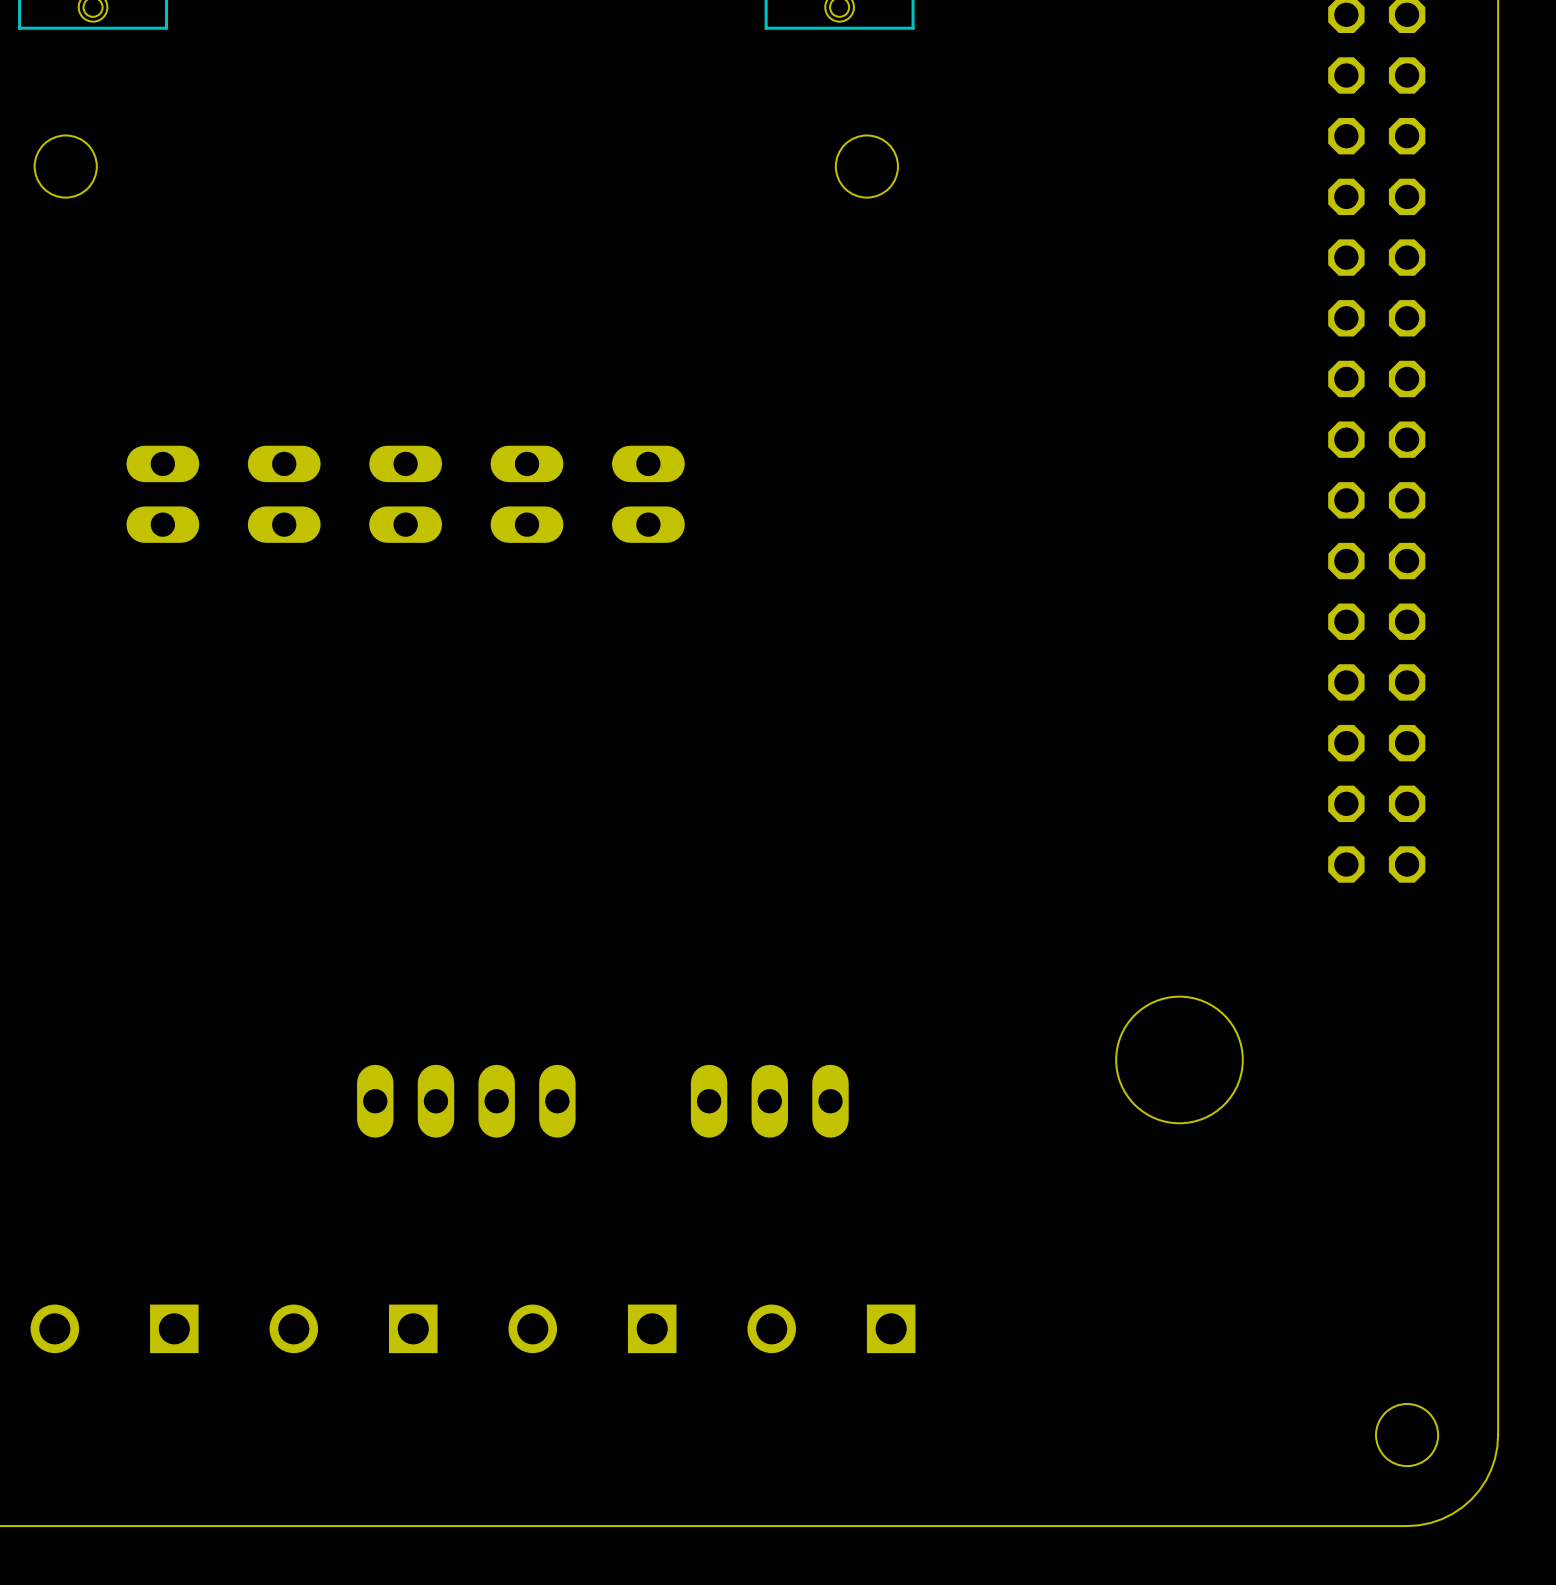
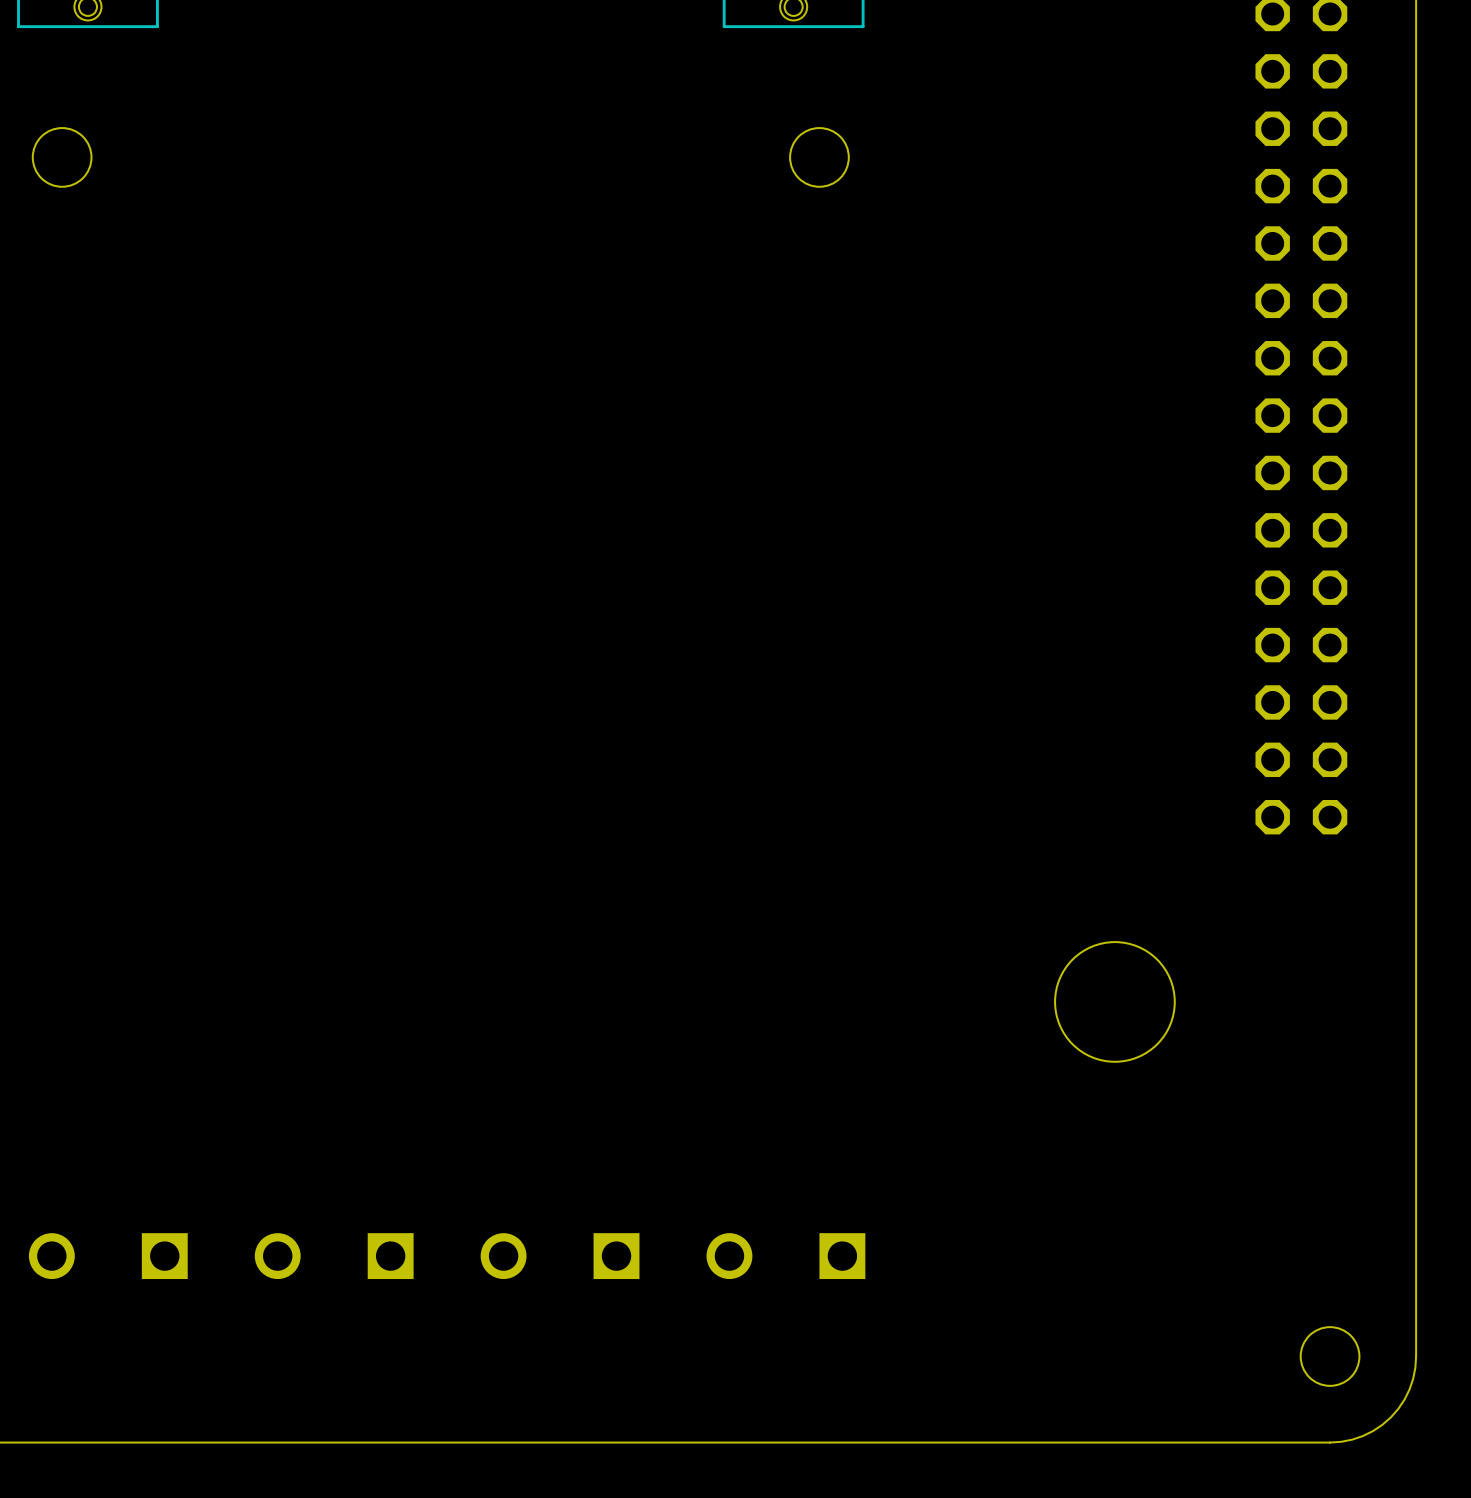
part: (162, 494) -> none
part: (284, 494) -> none
part: (405, 494) -> none
part: (527, 494) -> none
part: (648, 494) -> none
part: (466, 1101) -> none
part: (769, 1101) -> none

